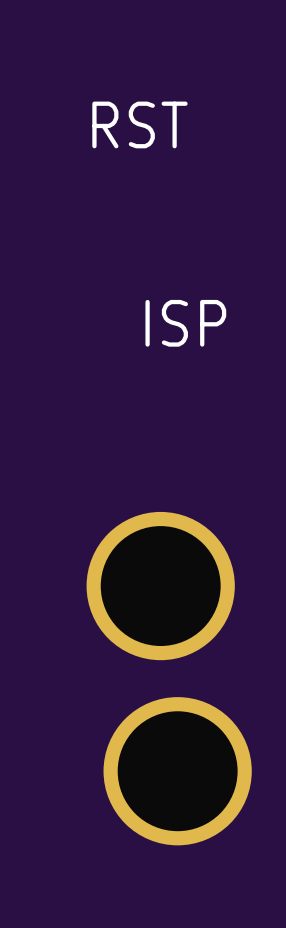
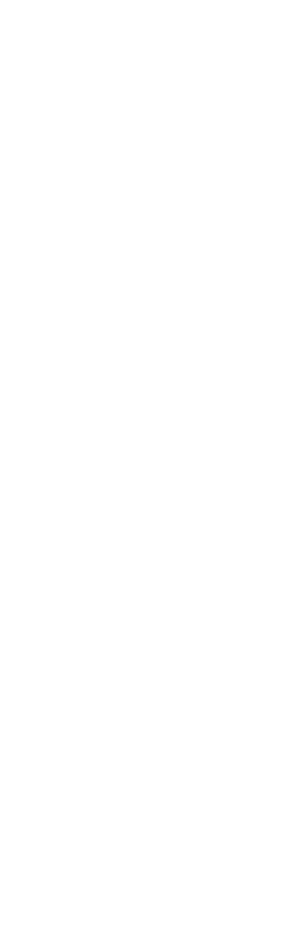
text: RST (139, 124) -> none
text: ISP (185, 323) -> none
part: (160, 586) -> none
part: (177, 771) -> none

